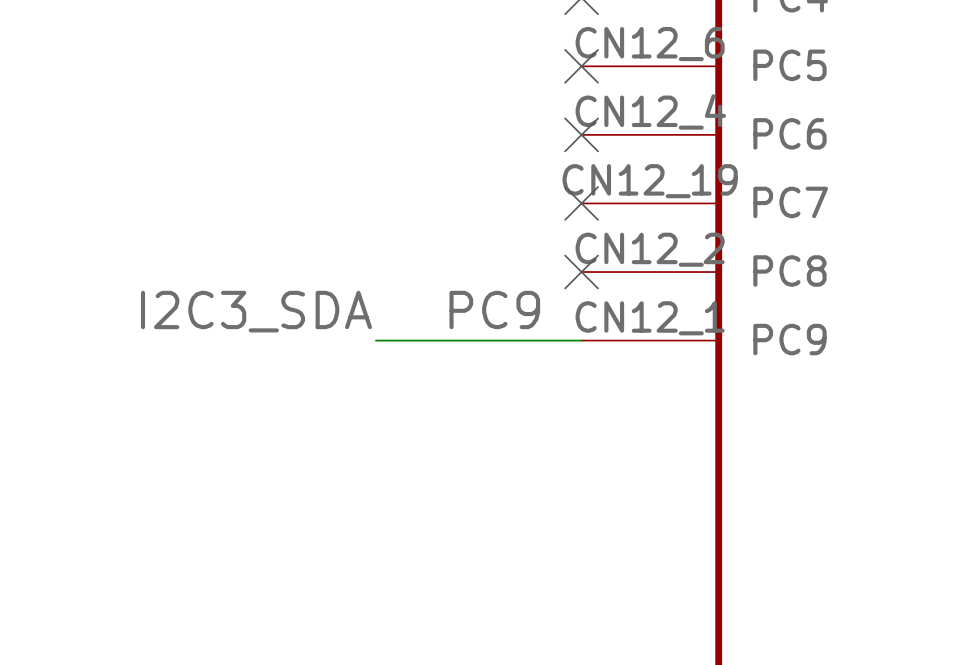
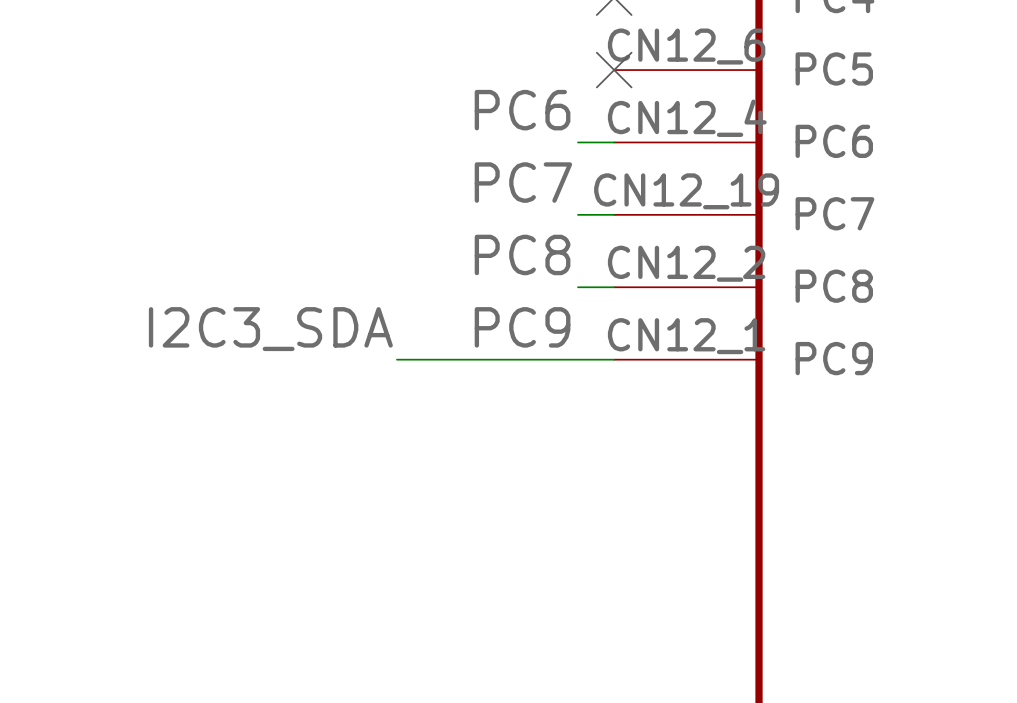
label: none -> PC6 (522, 110)
wire: none -> (577, 142) (614, 142)
no-connect mark: (581, 134) -> none
label: none -> PC7 (523, 182)
wire: none -> (577, 214) (614, 214)
no-connect mark: (581, 203) -> none
label: none -> PC8 (522, 254)
wire: none -> (577, 287) (614, 287)
no-connect mark: (581, 272) -> none

